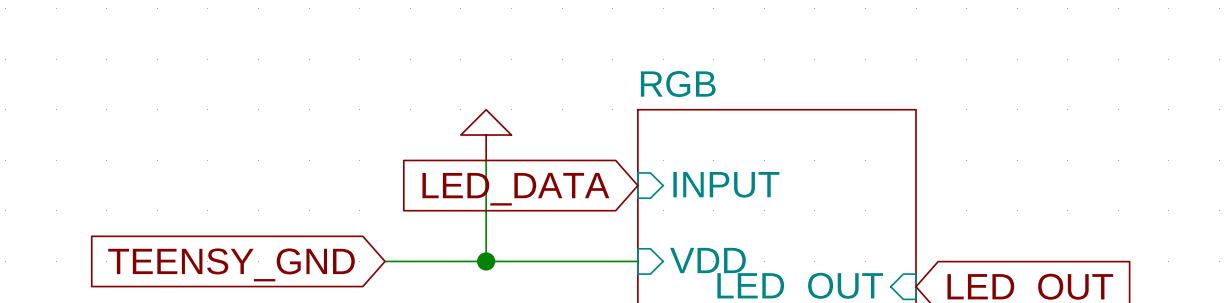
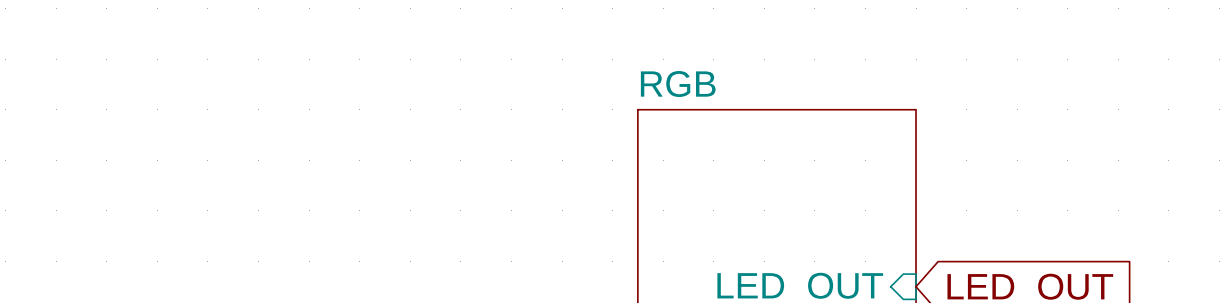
power symbol: (486, 135) -> none
wire: (486, 160) (486, 261) -> none
sheet pin: INPUT (726, 184) -> none
global label: LED_DATA (515, 189) -> none
sheet pin: VDD (707, 260) -> none
wire: (385, 261) (637, 261) -> none
junction: (486, 261) -> none
global label: TEENSY_GND (231, 264) -> none

